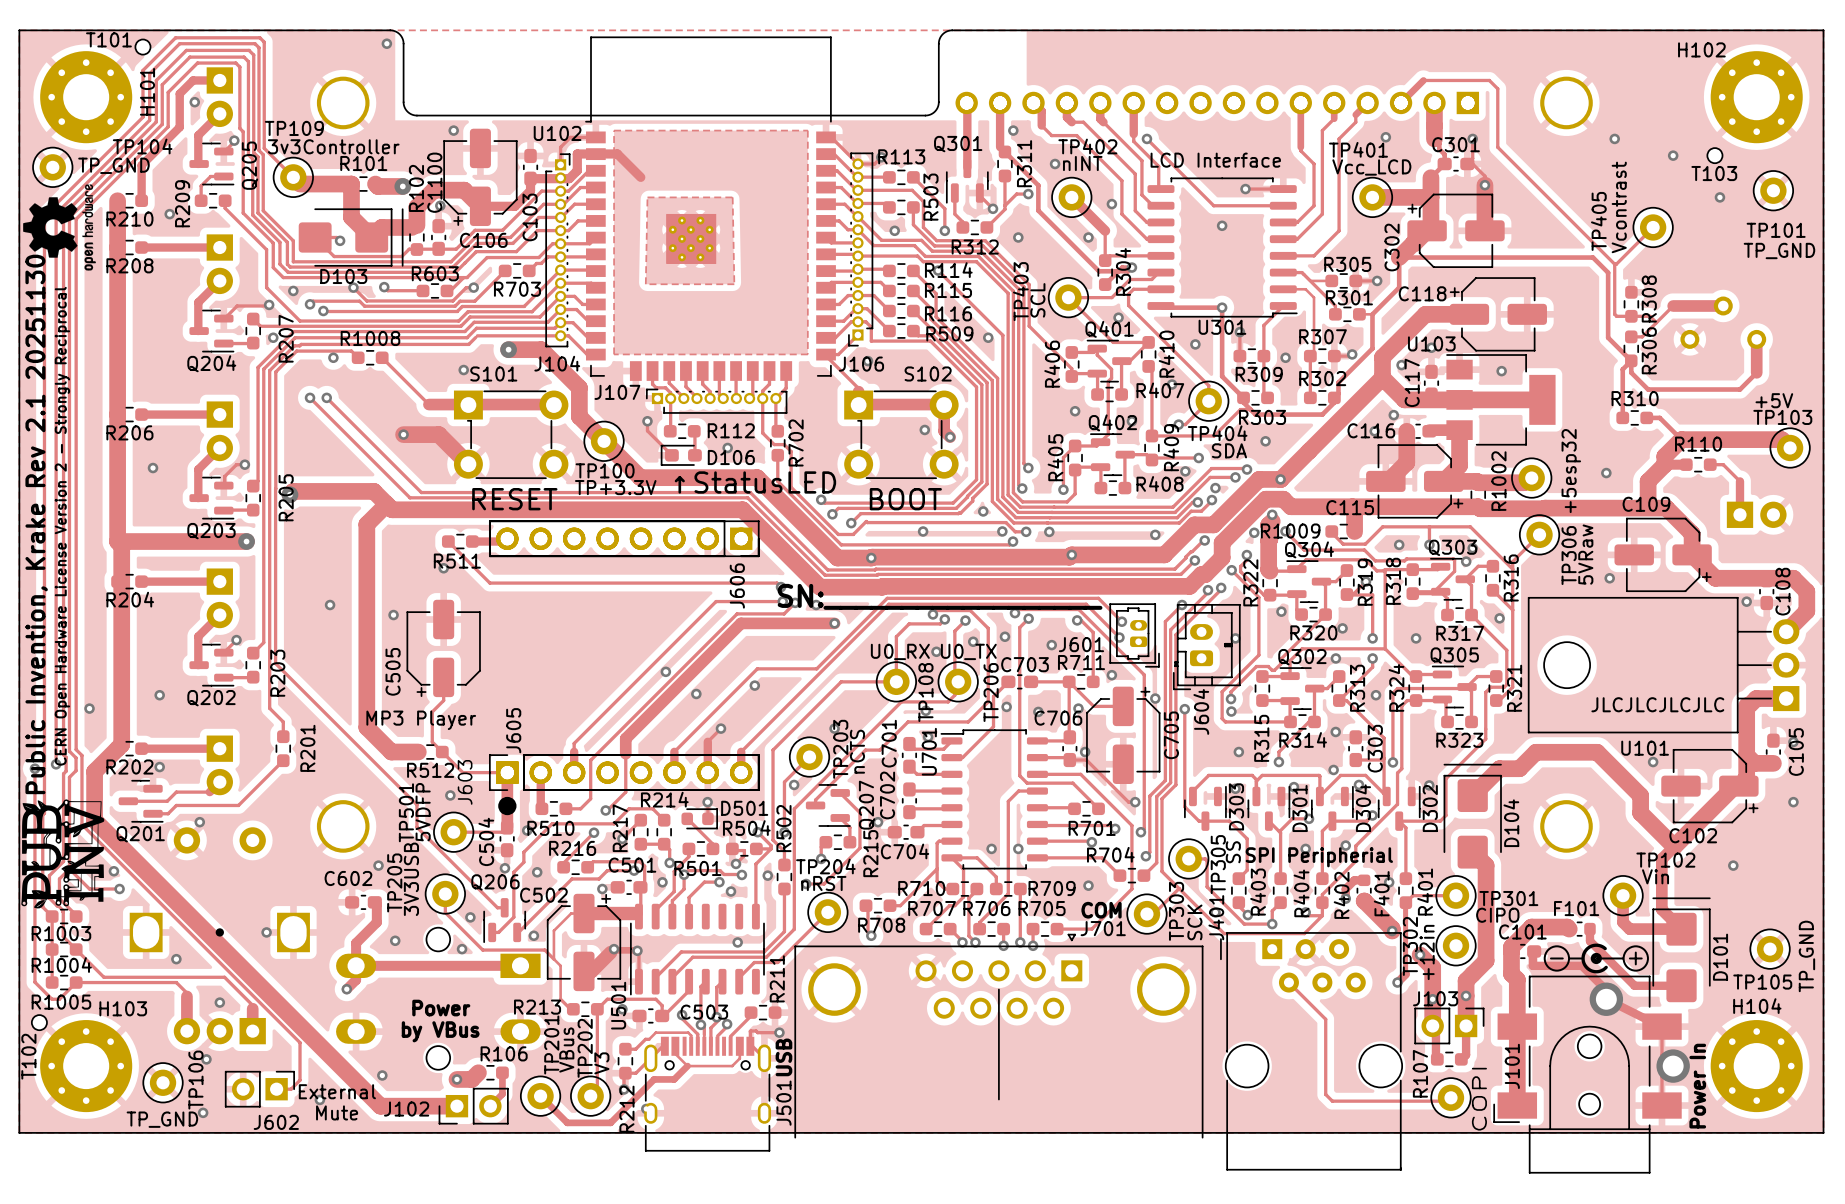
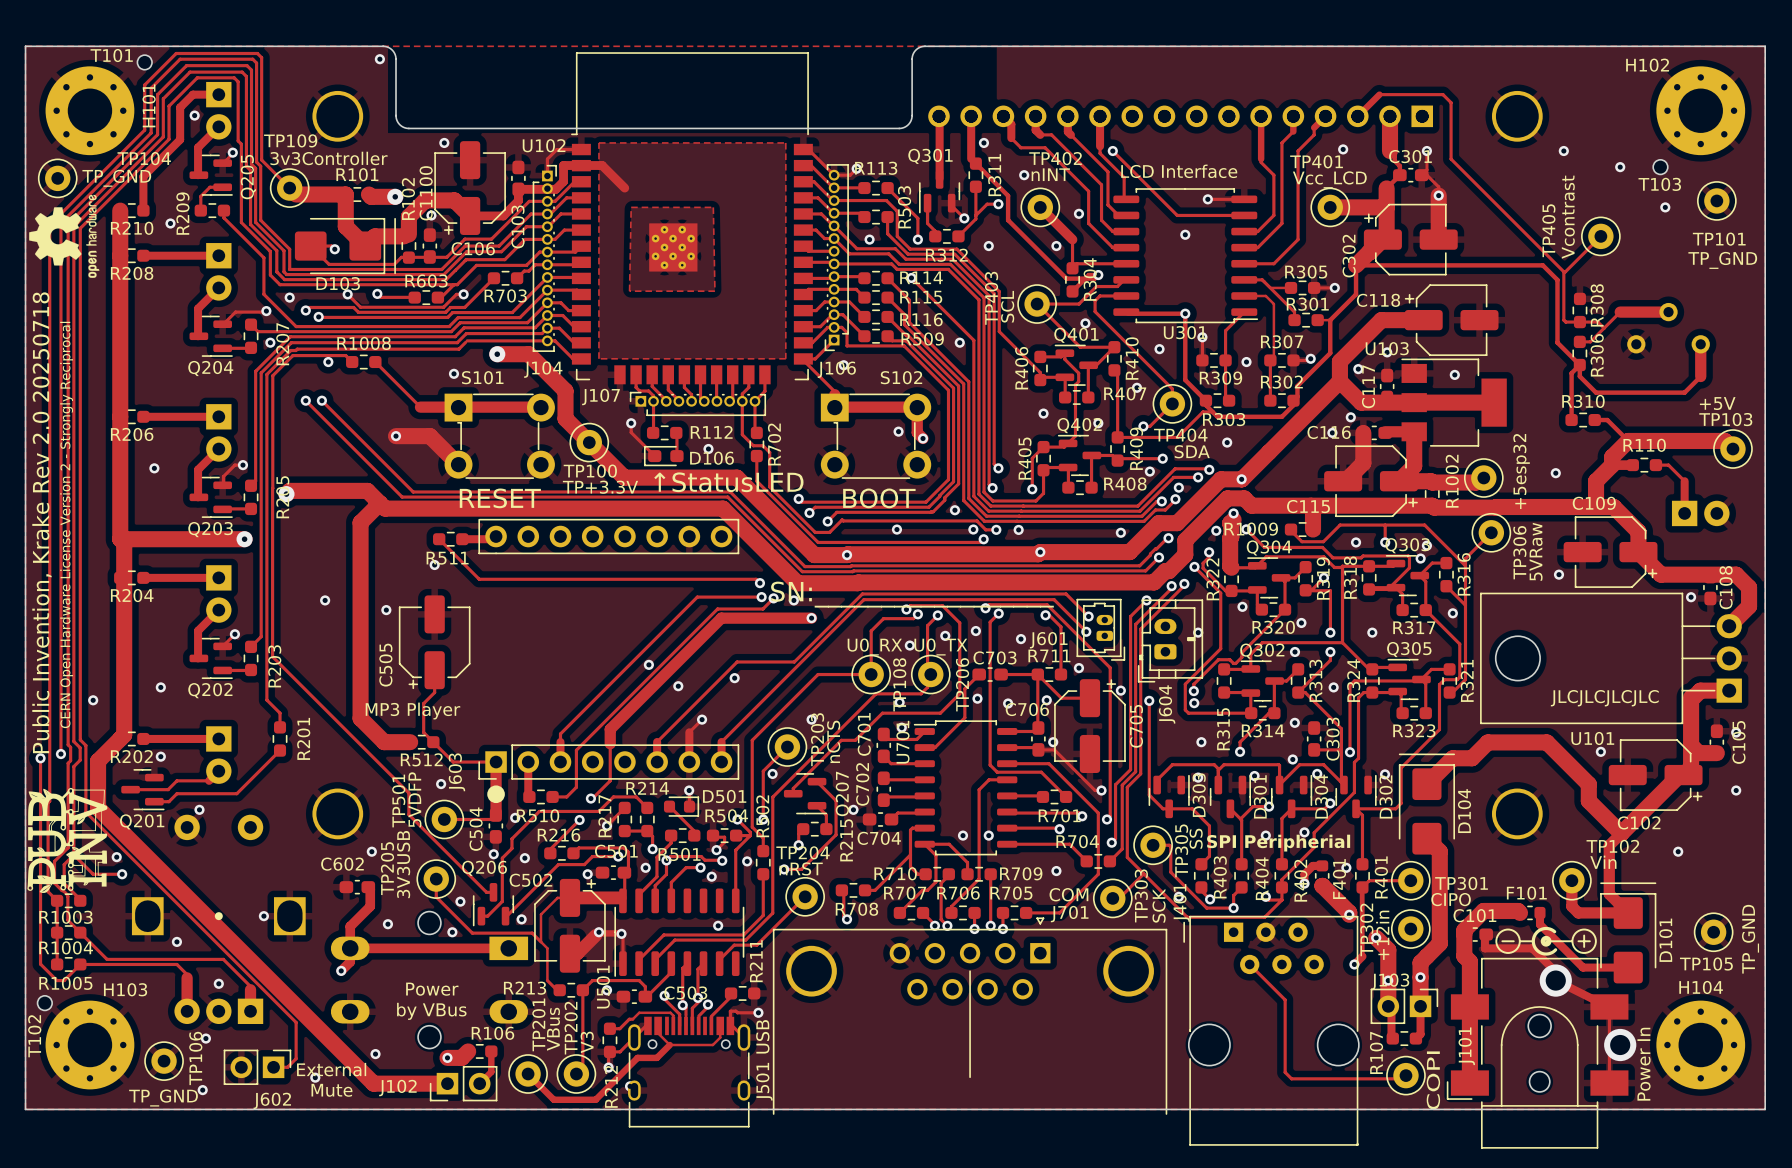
text: Public Invention, Krake Rev 2.1 20251130 (36, 524) -> Public Invention, Krake Rev 2.0 20250718 (41, 522)
J606: (624, 538) -> none
J605: (624, 772) -> none

